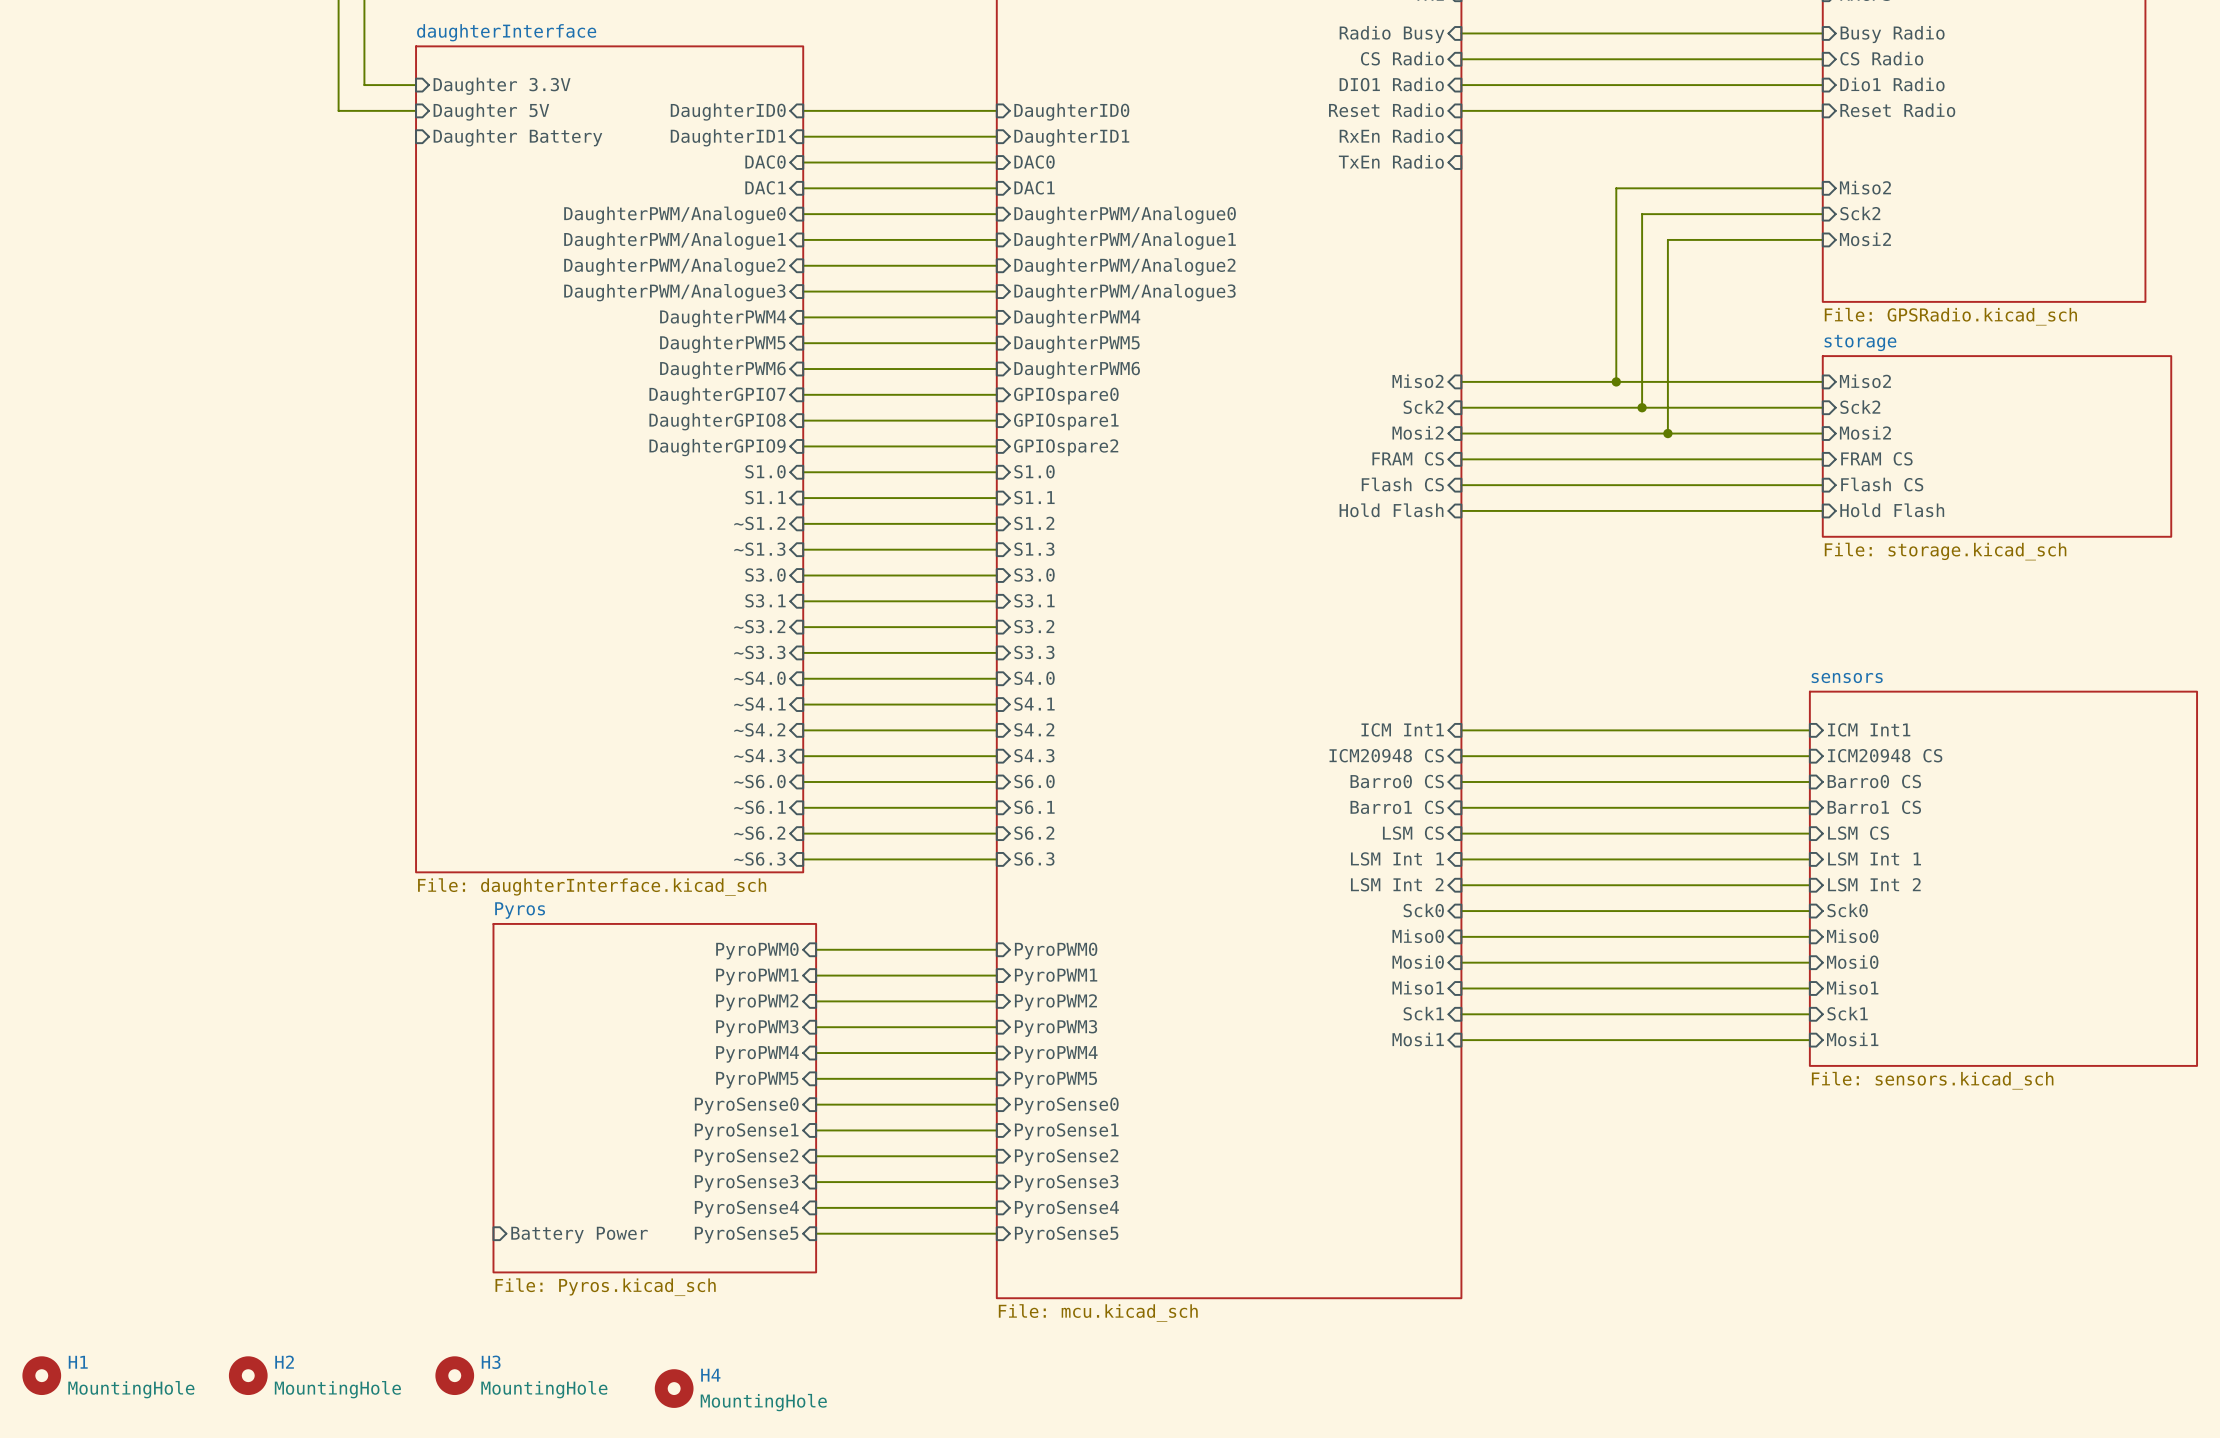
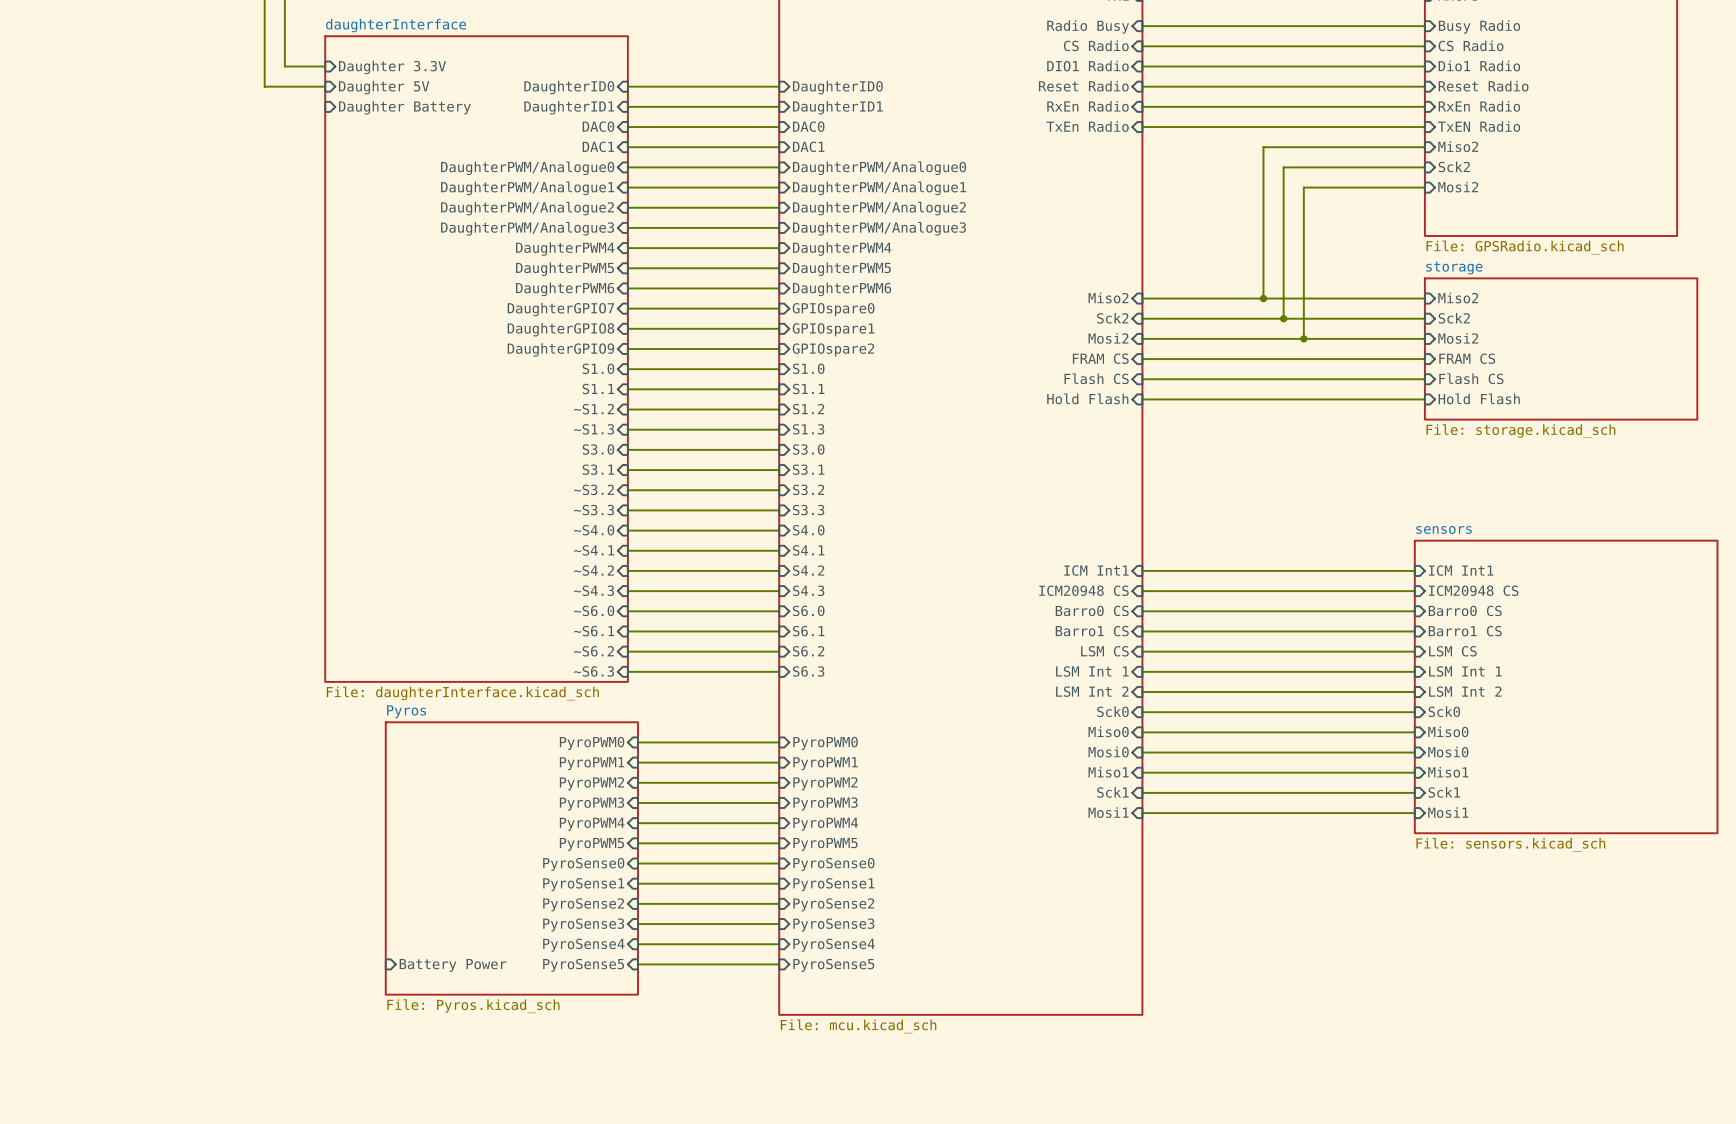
wire: none -> (1142, 106) (1424, 106)
sheet pin: none -> RxEn Radio (1479, 106)
sheet pin: none -> TxEN Radio (1479, 126)
wire: none -> (1142, 127) (1424, 127)
H1: MountingHole (41, 1375) -> none
H2: MountingHole (248, 1375) -> none
H3: MountingHole (454, 1375) -> none
H4: MountingHole (674, 1388) -> none

